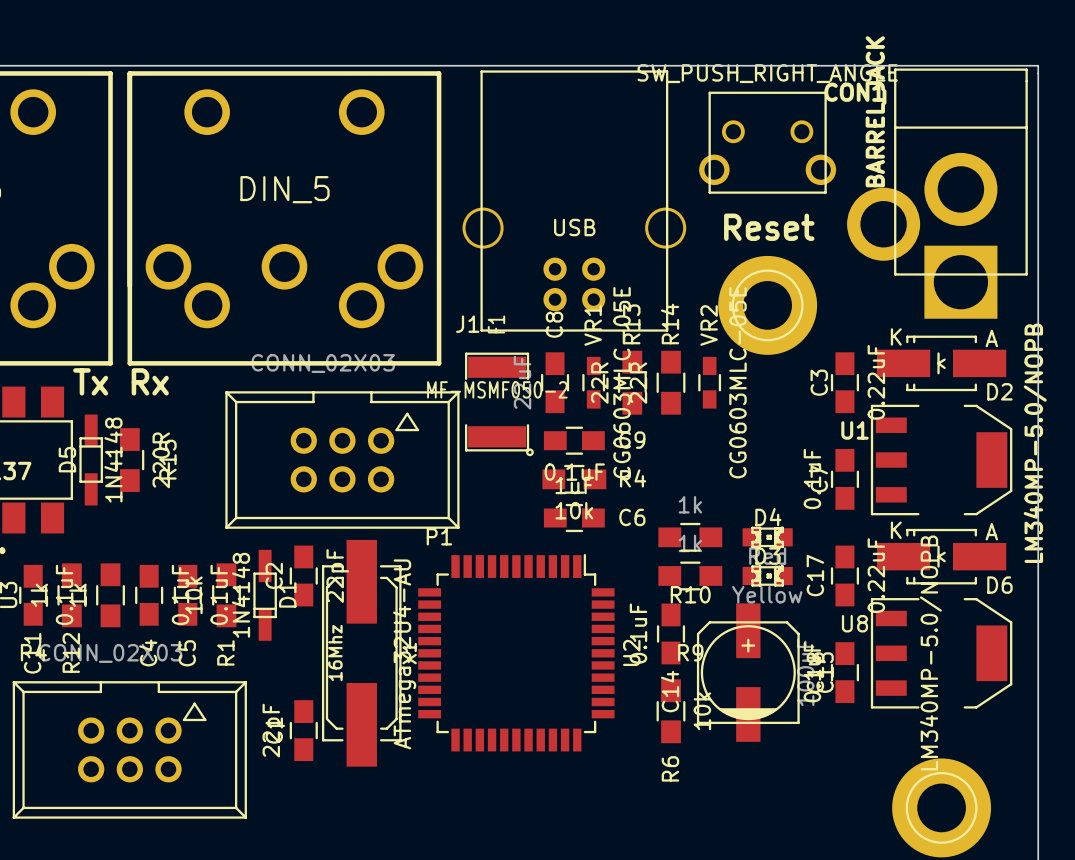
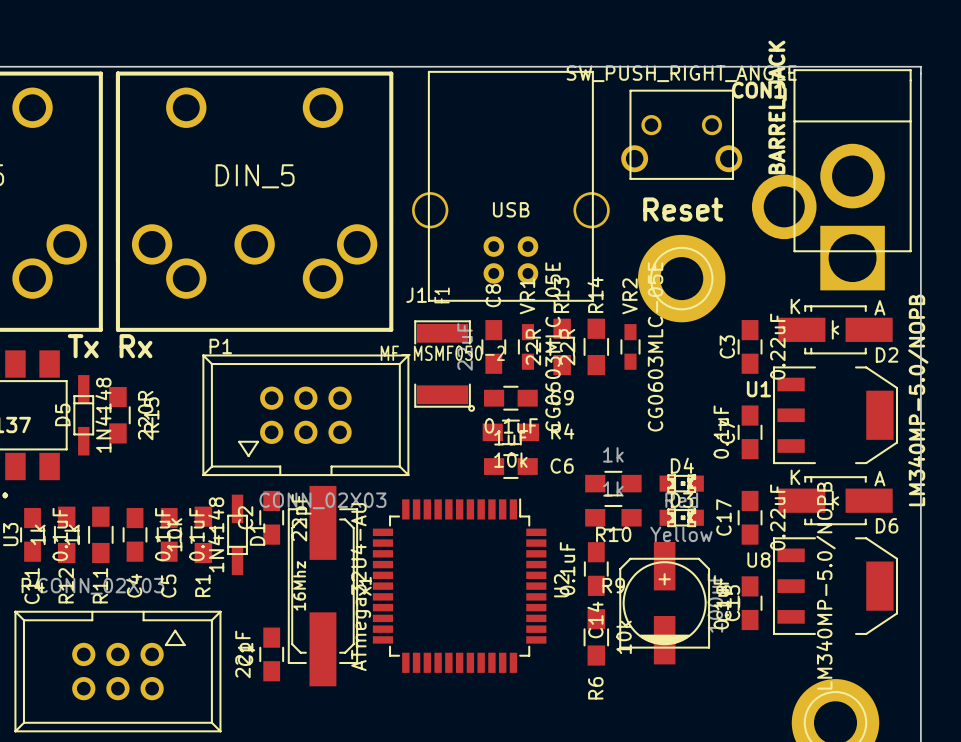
P1 rotation: 0° (342, 460) -> 180° (305, 415)
R11 name: none -> R11 (100, 585)

